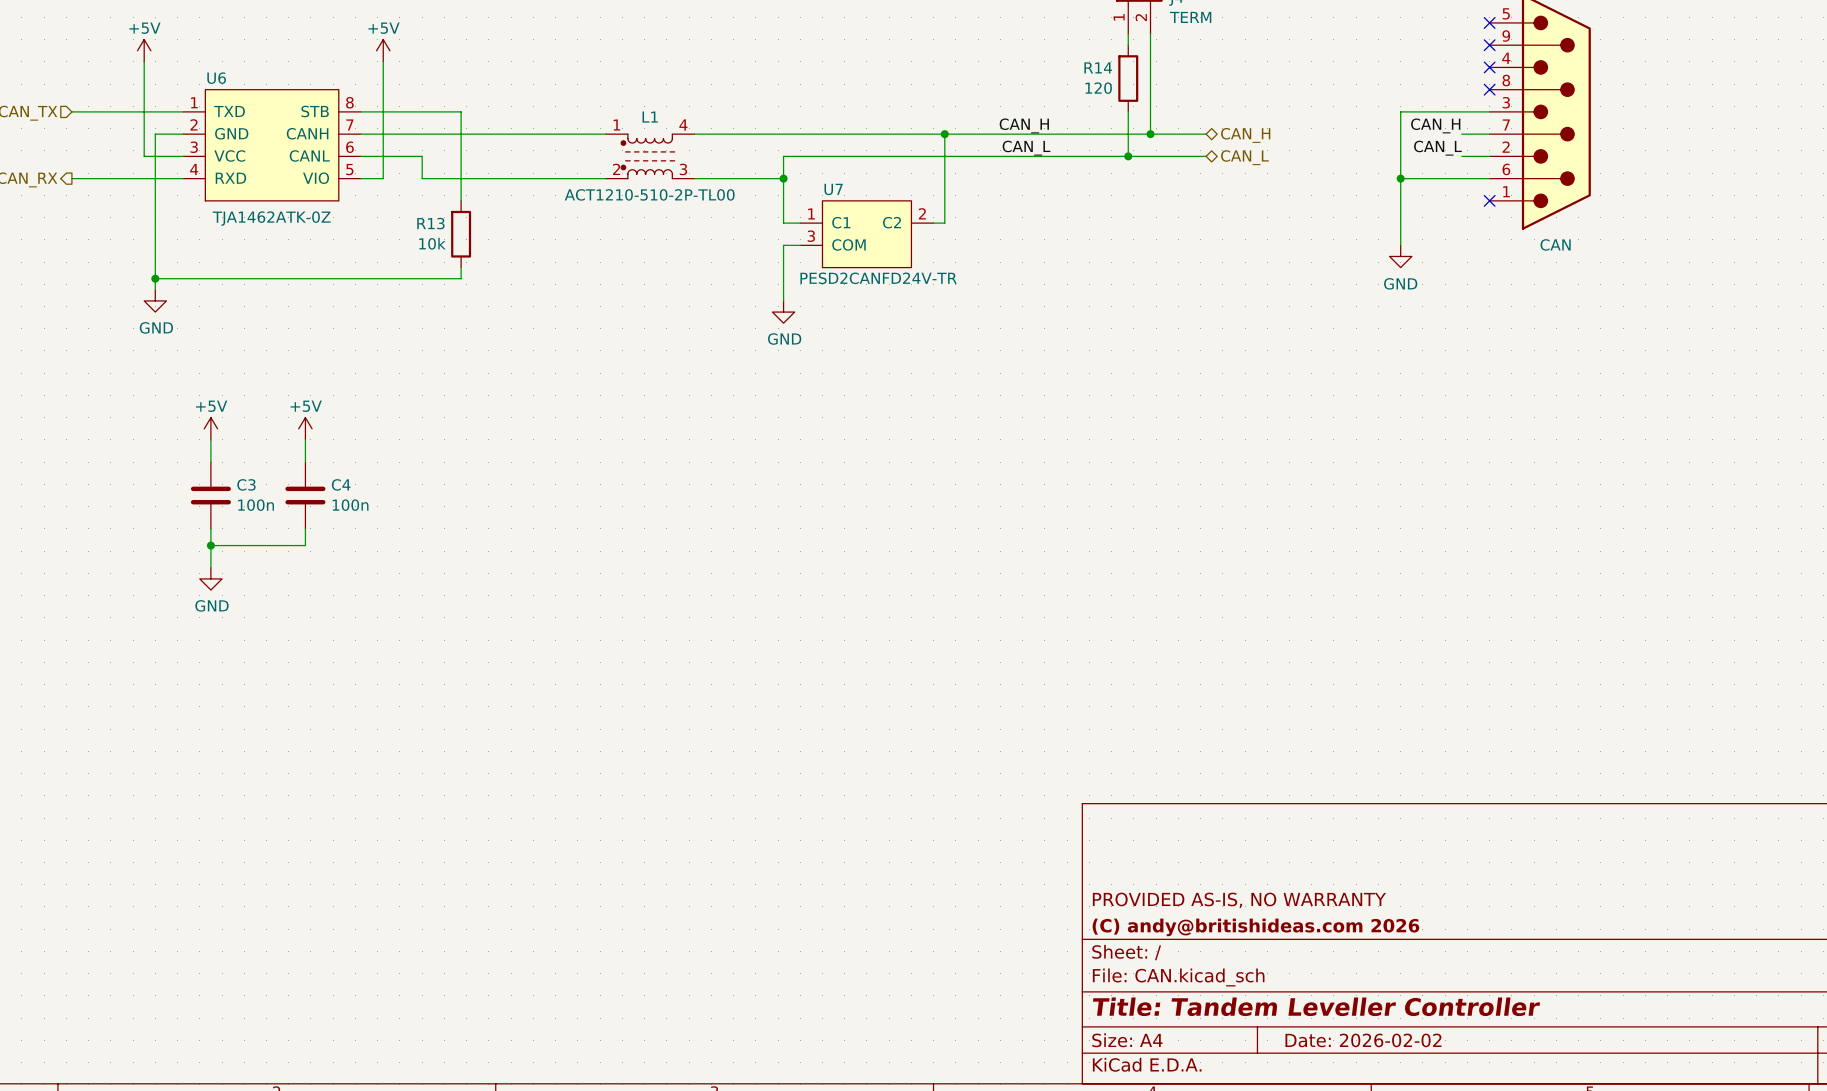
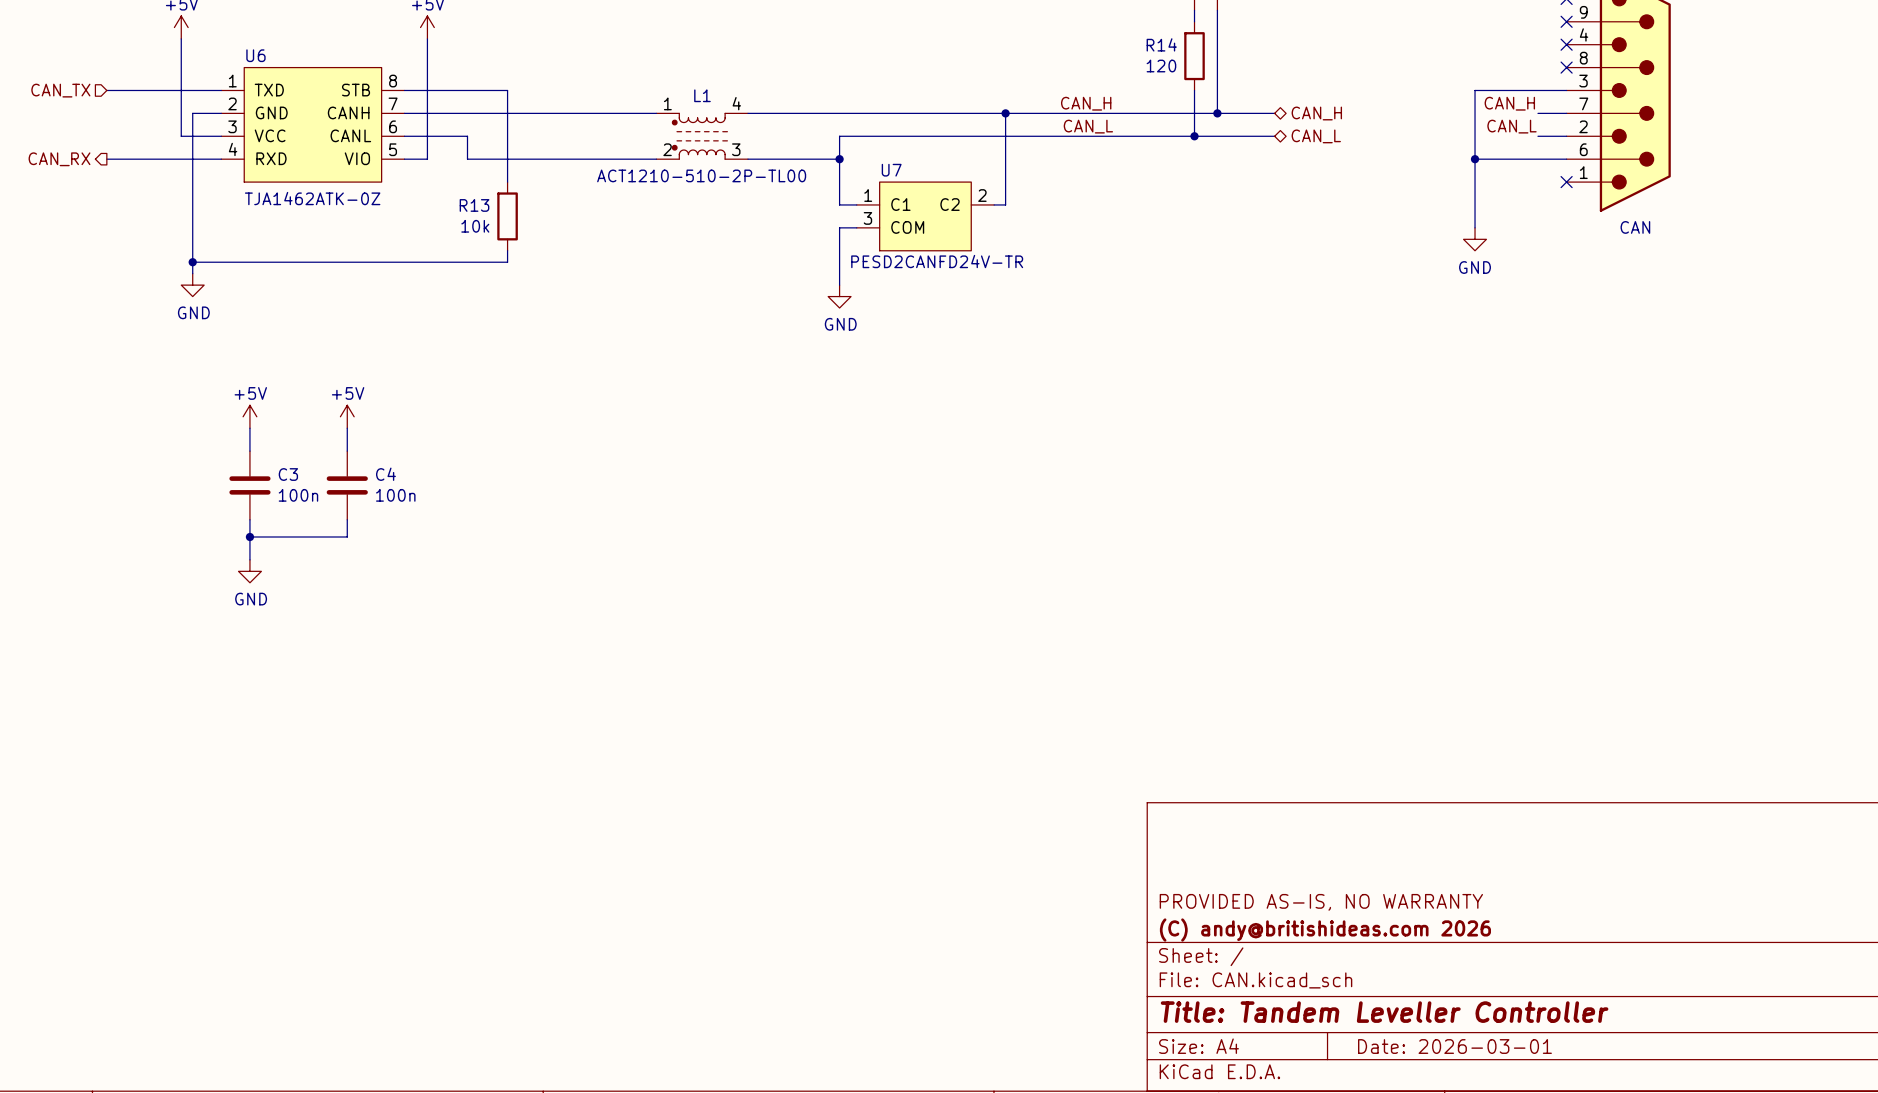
title block: Date: 2026-02-02 (1363, 1040) -> Date: 2026-03-01 (1454, 1046)

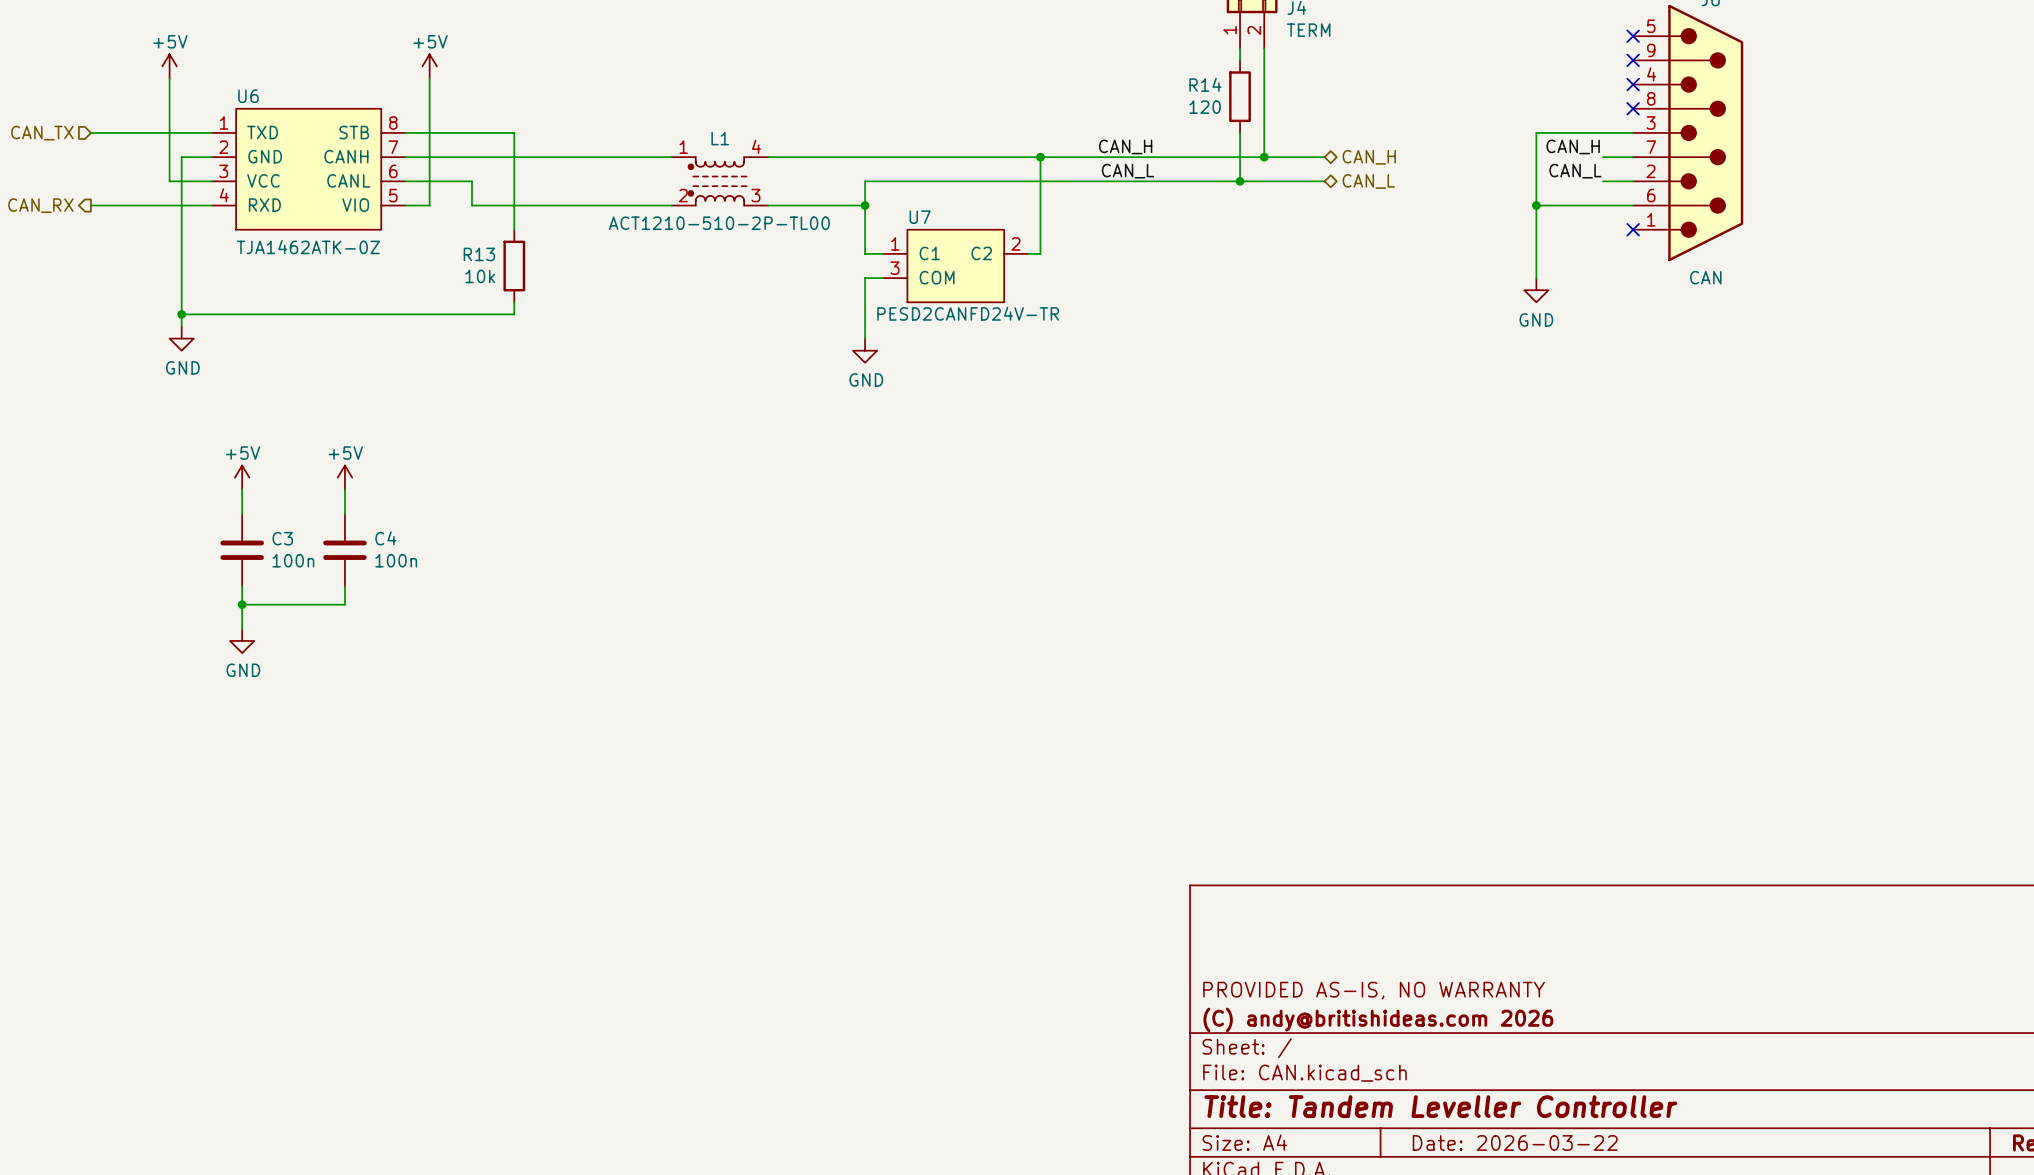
title block: Date: 2026-03-01 (1454, 1046) -> Date: 2026-03-22 (1515, 1142)

